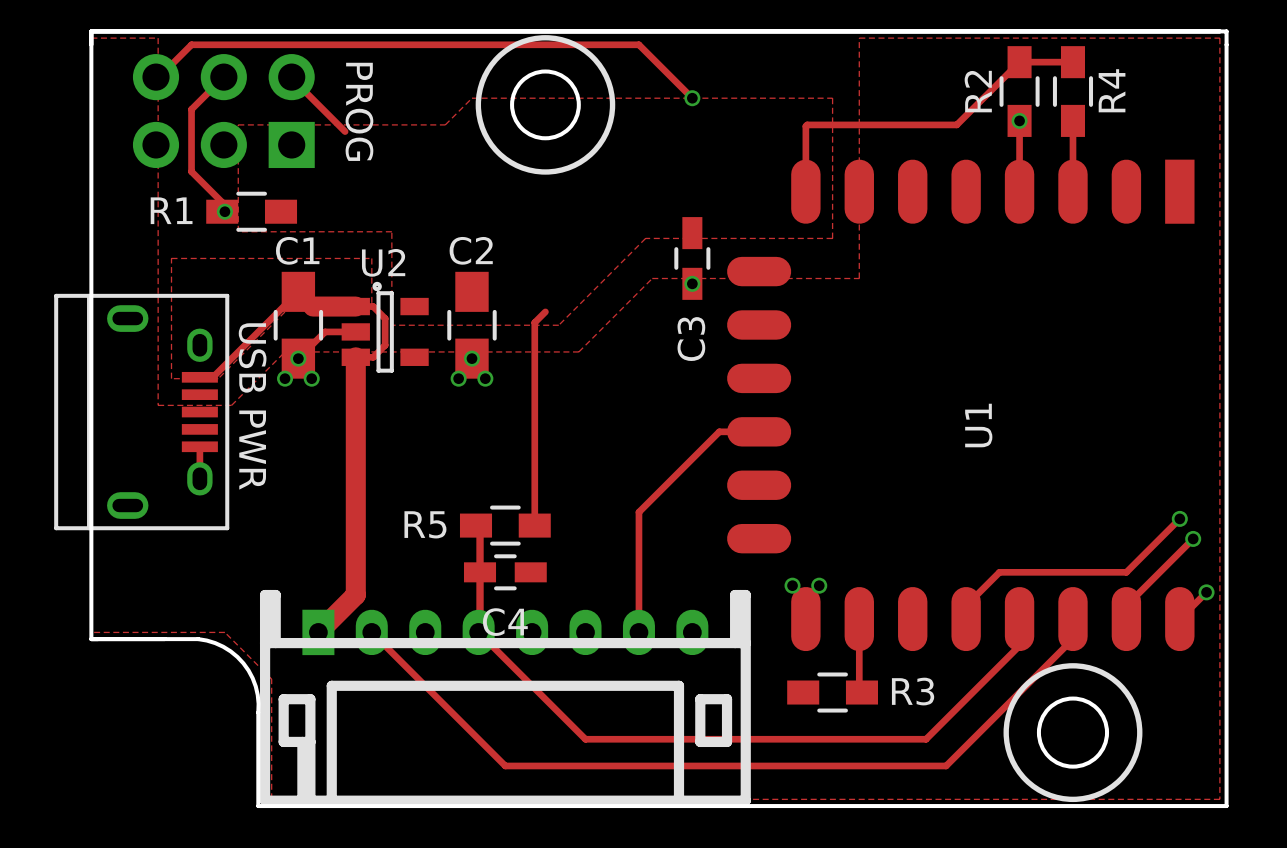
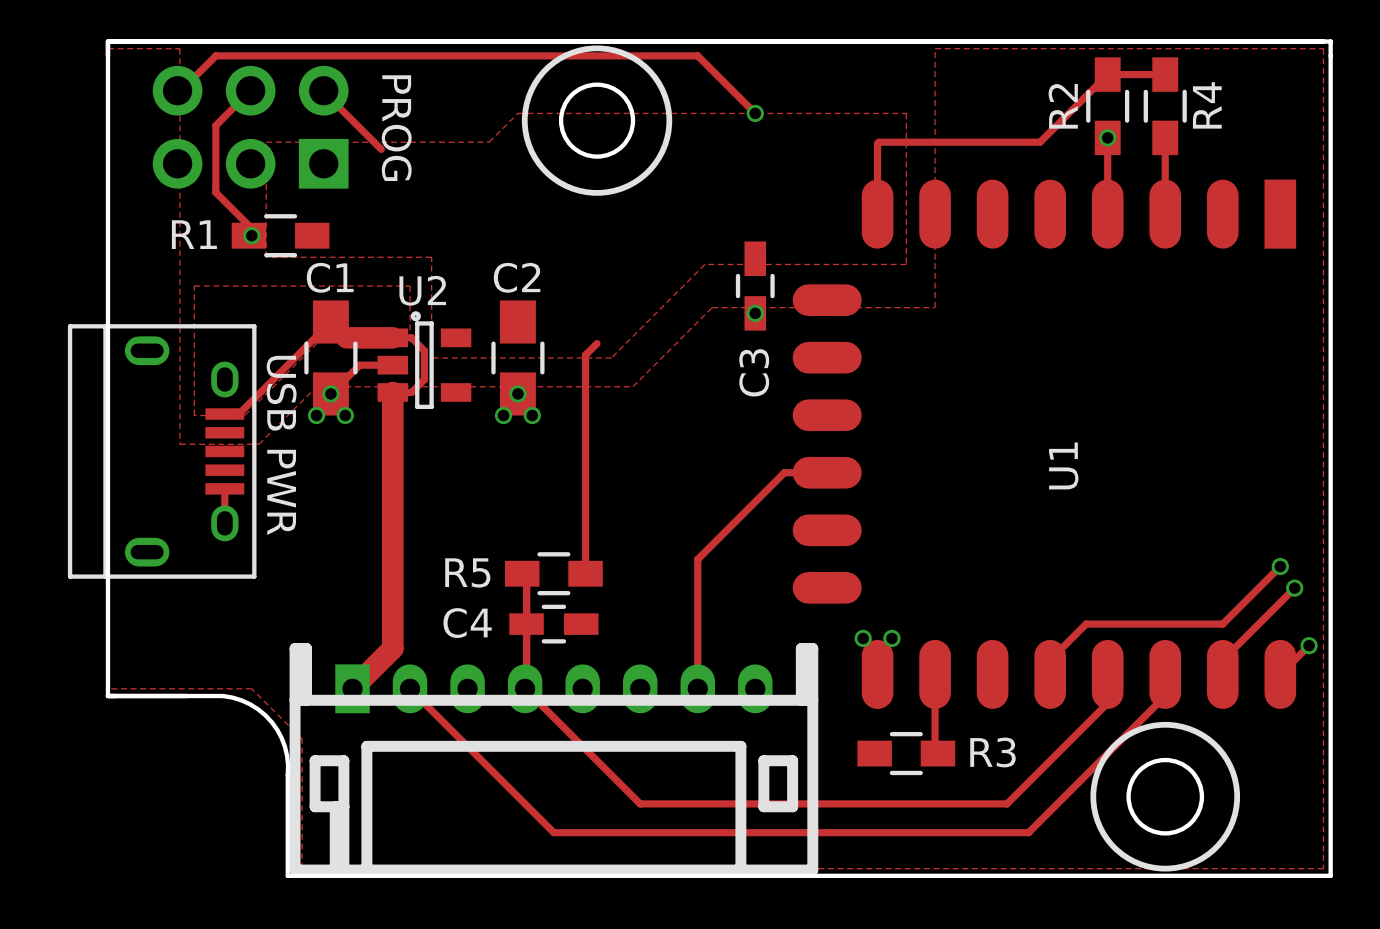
C4 name position: C4 (505, 622) -> C4 (467, 623)

